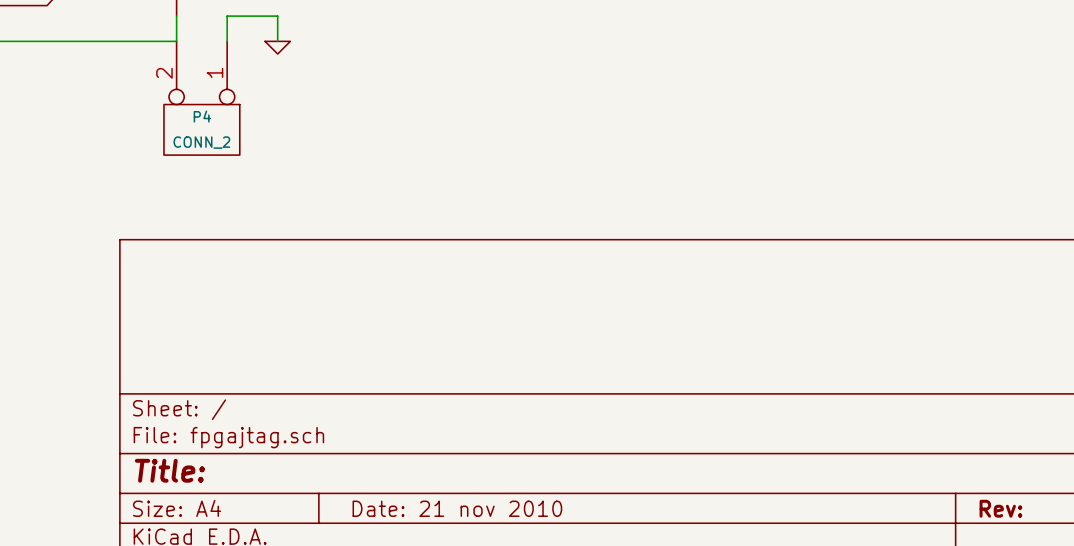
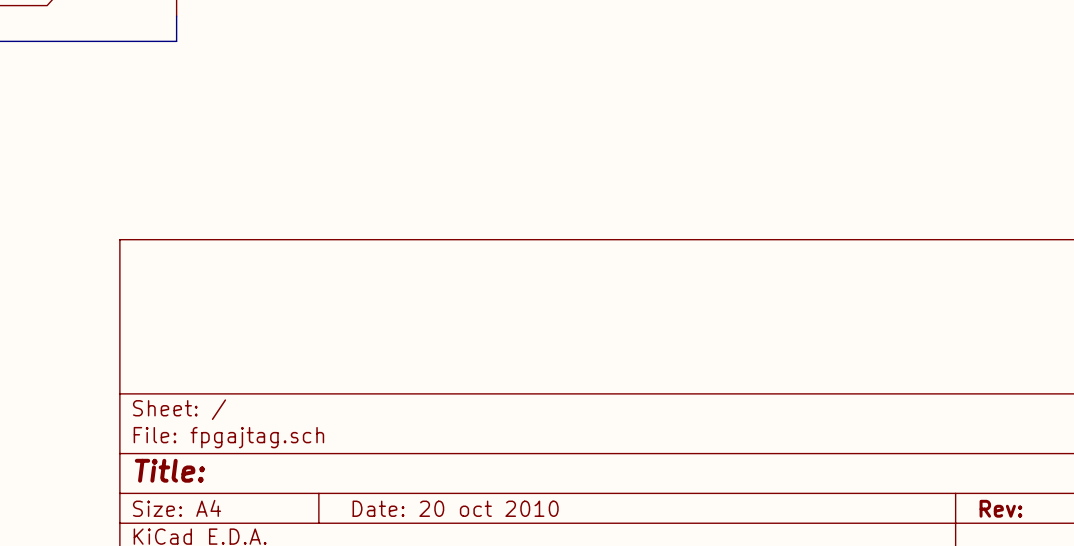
wire: (227, 41) (227, 16) (277, 16) (277, 41) -> none
power symbol: (277, 47) -> none
P4: CONN_2 (201, 98) -> none
title block: Date: 21 nov 2010 (457, 508) -> Date: 20 oct 2010 (455, 508)

